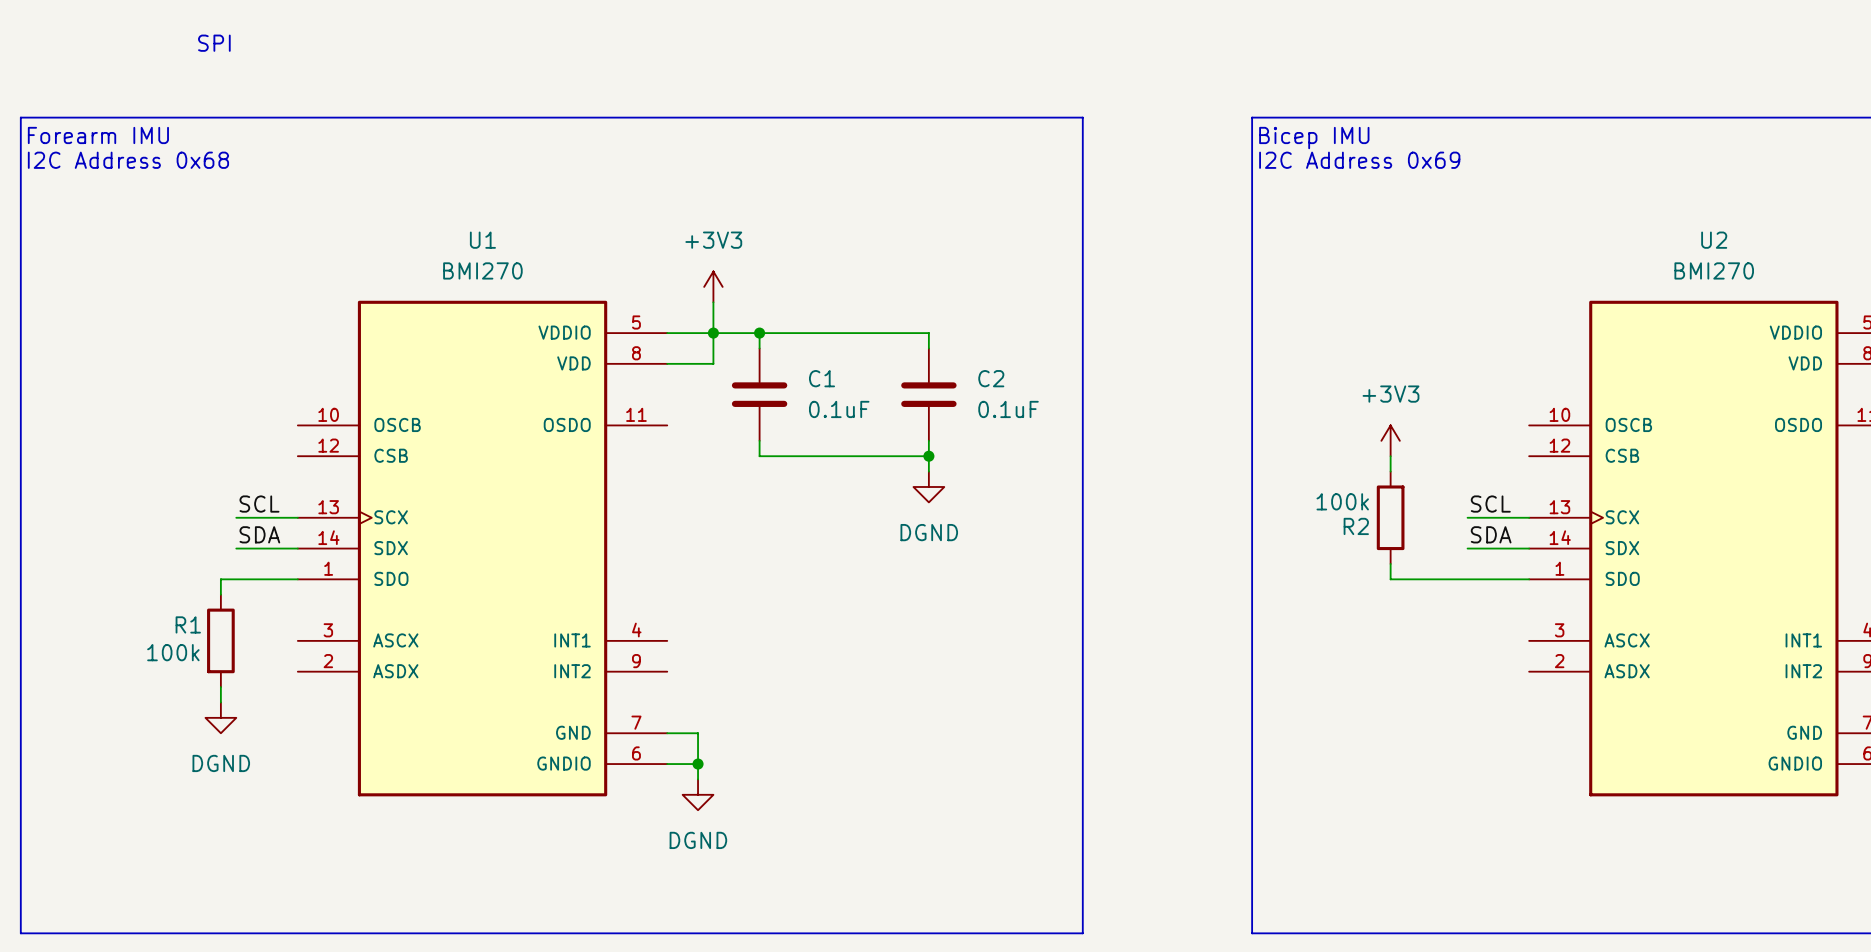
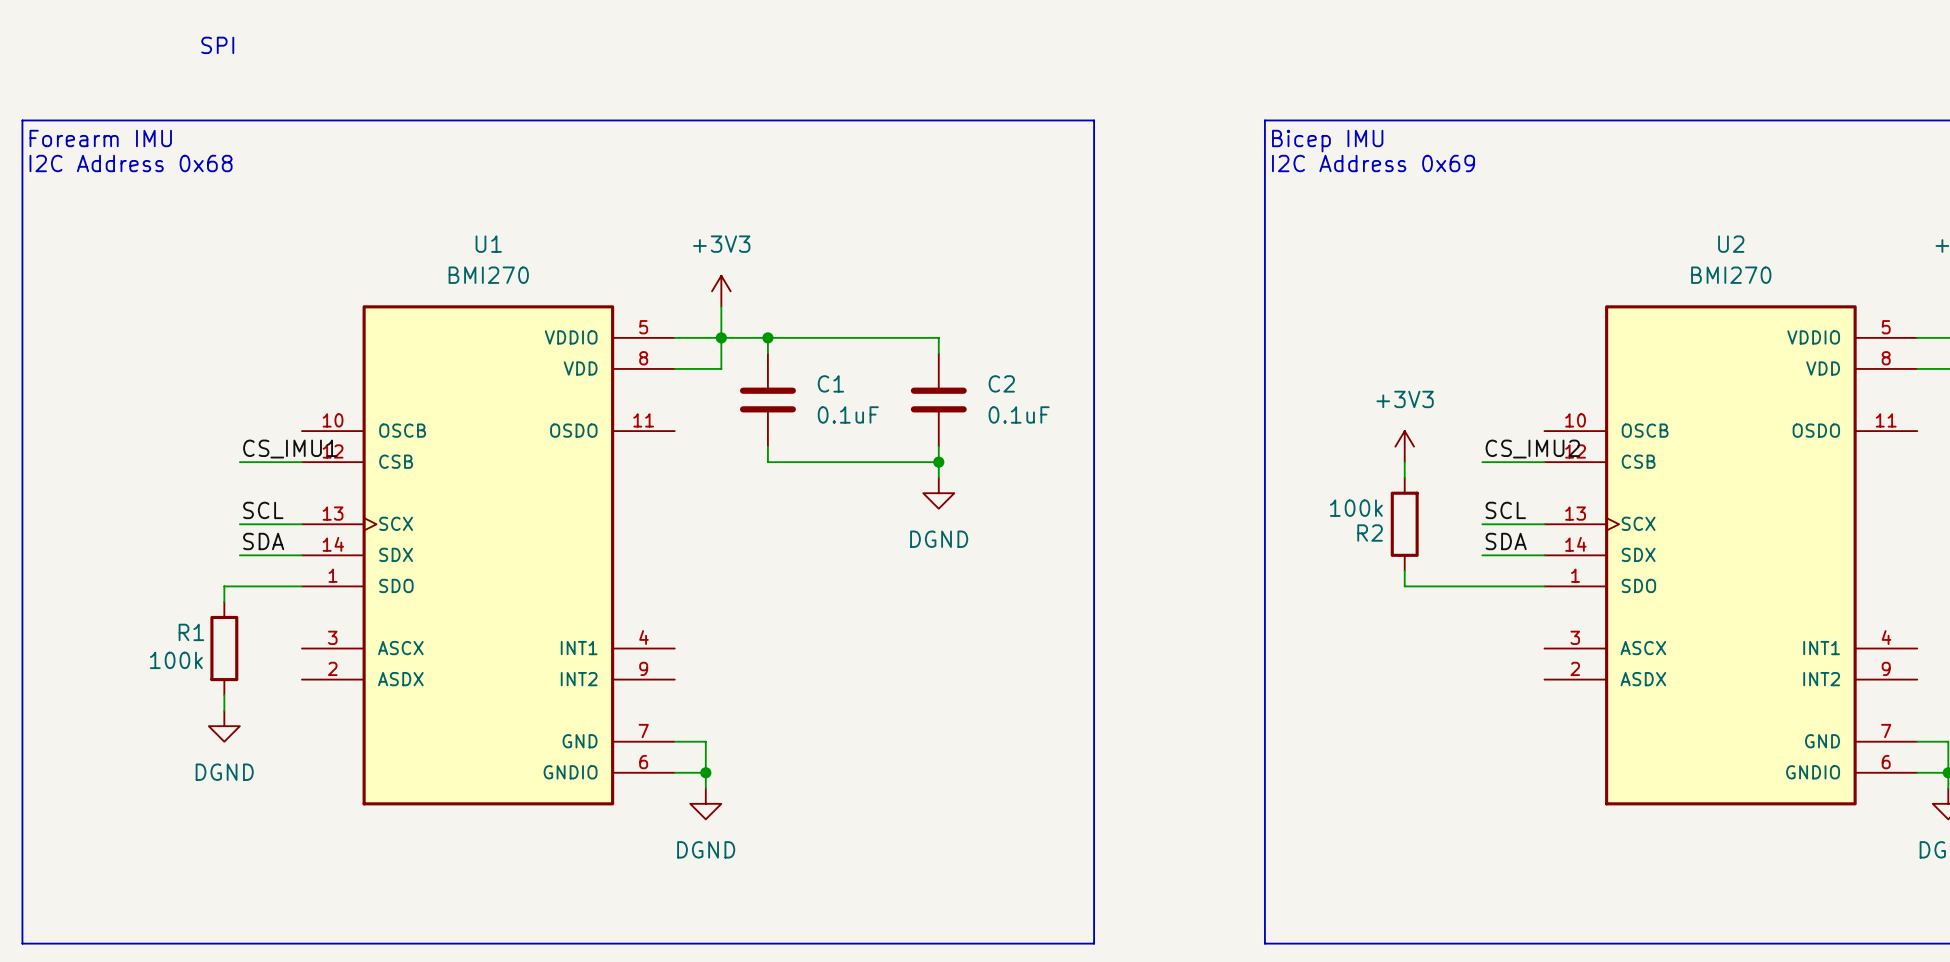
label: none -> CS_IMU1 (290, 449)
label: none -> CS_IMU2 (1532, 449)
wire: none -> (239, 462) (302, 462)
wire: none -> (1482, 462) (1544, 462)

